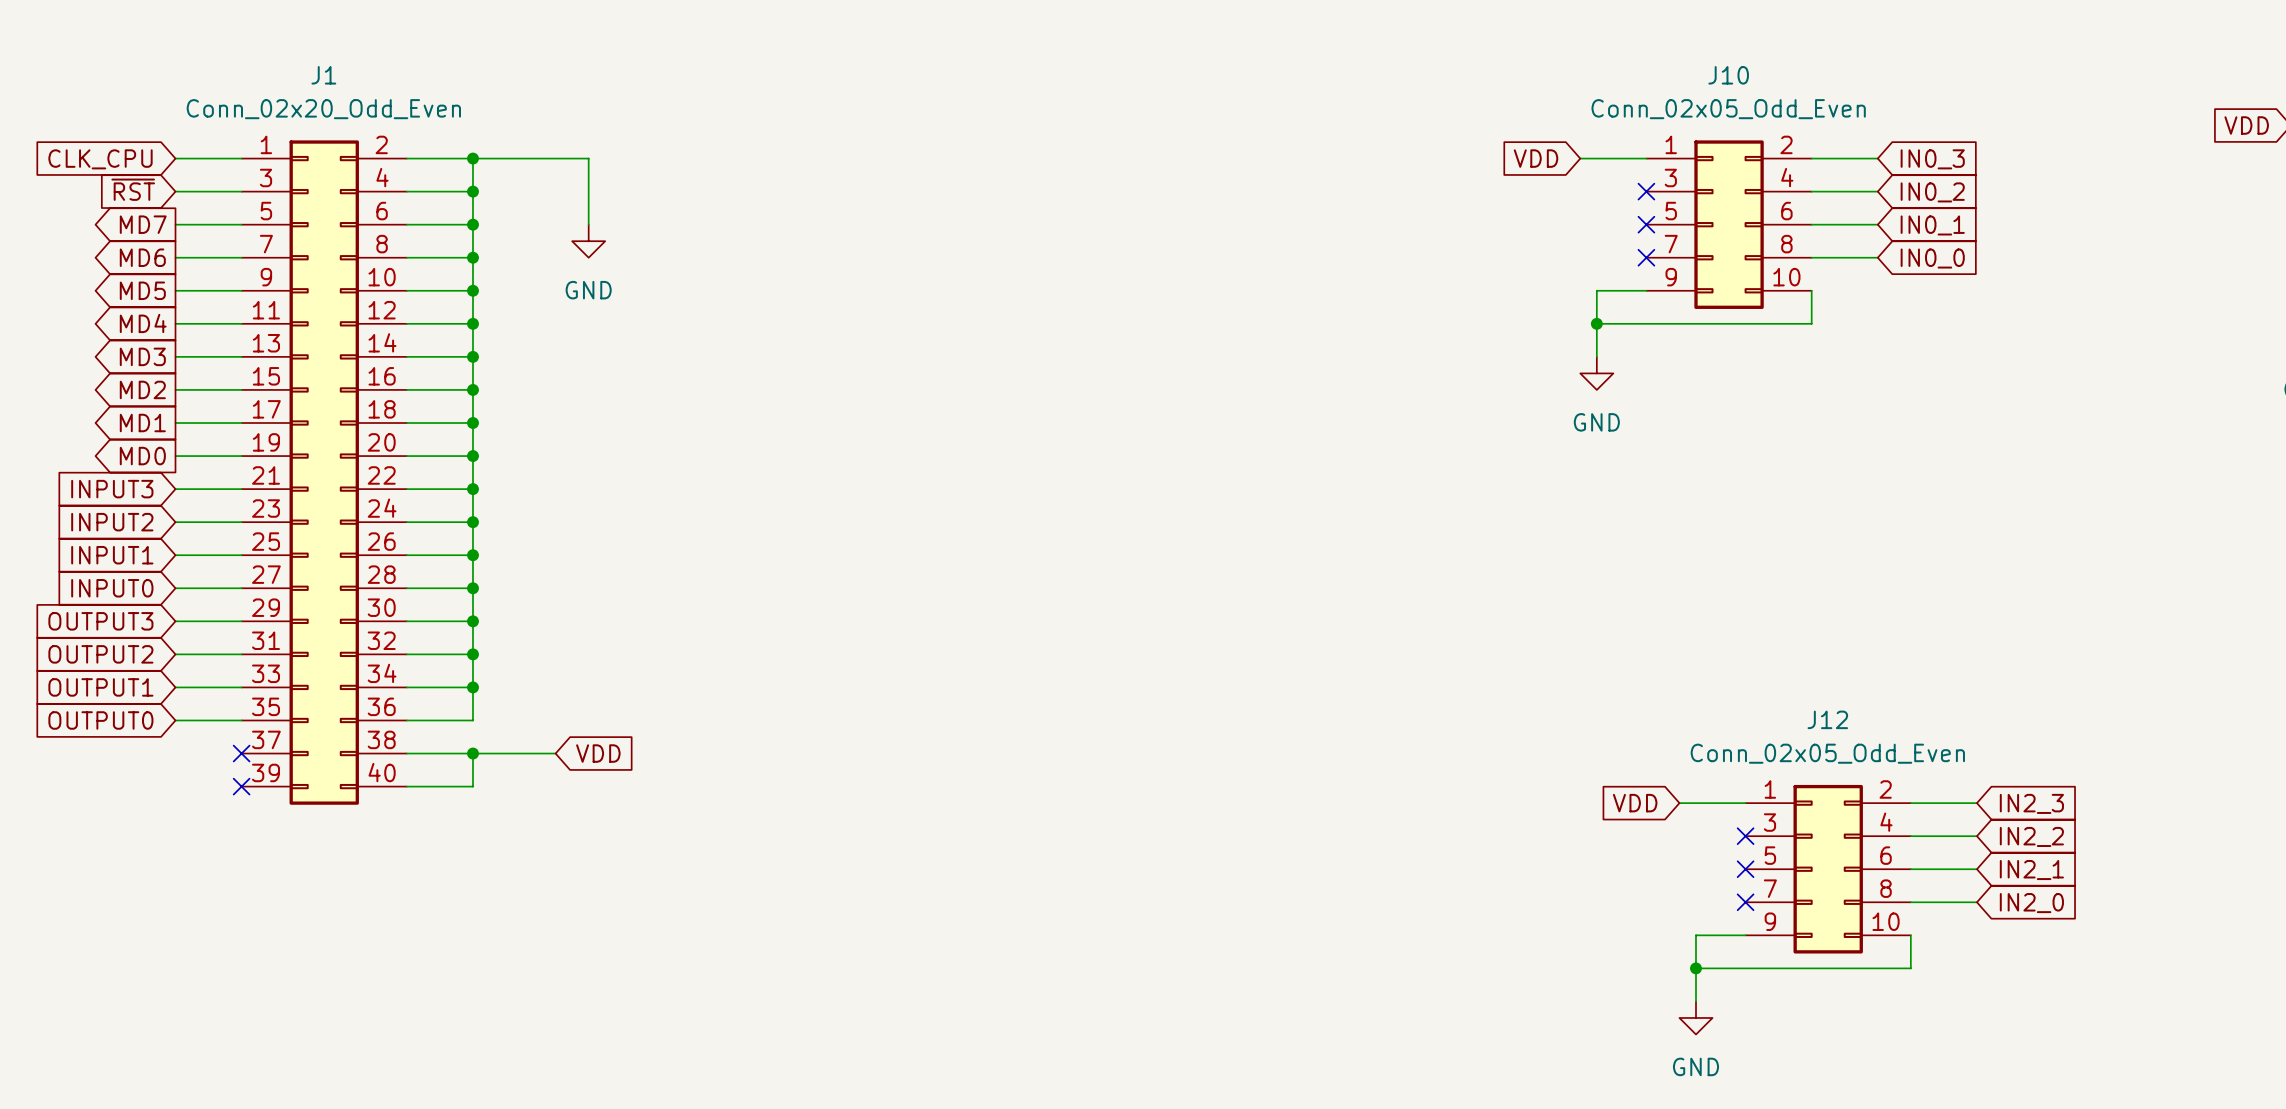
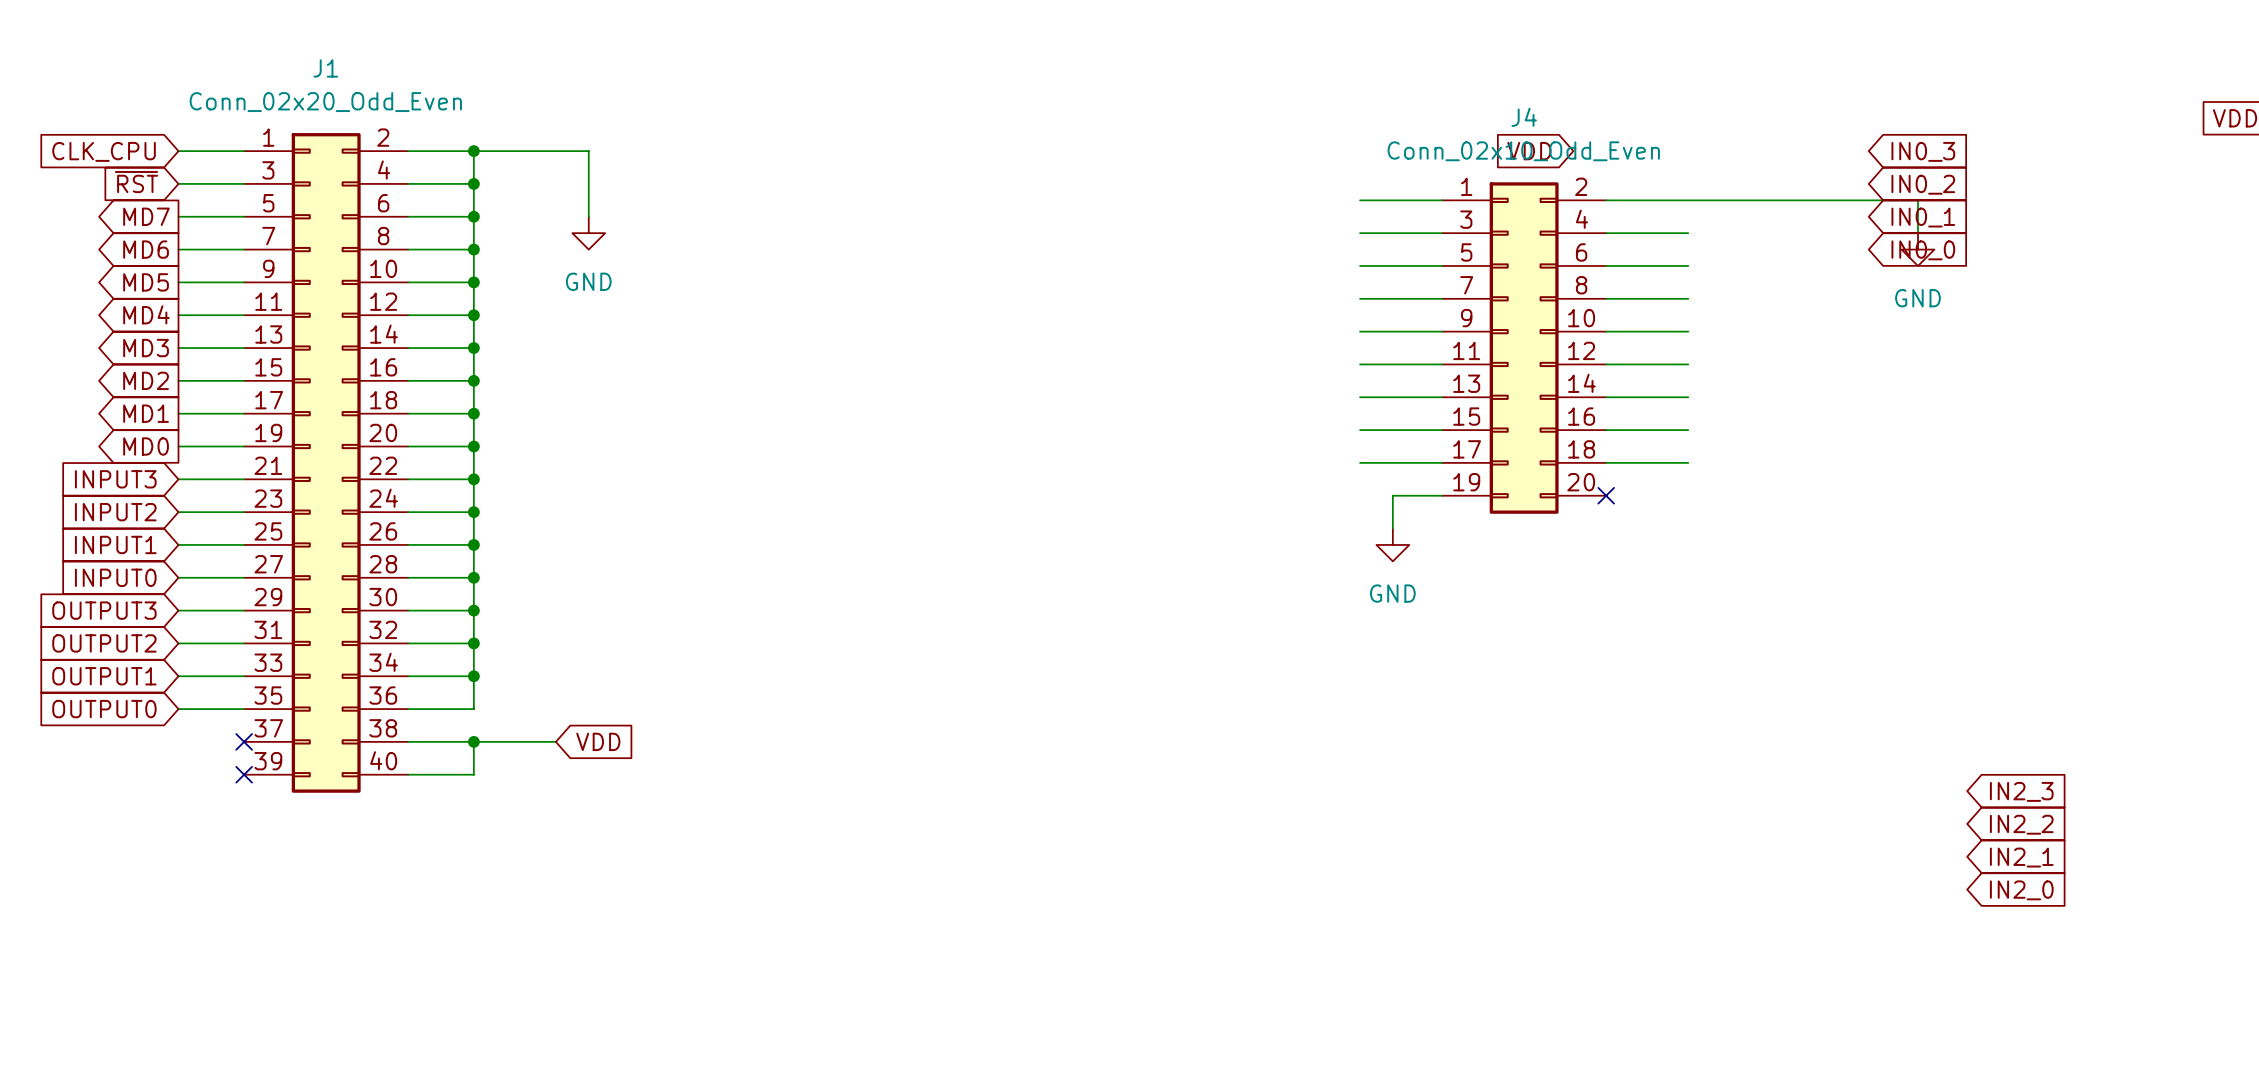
wire: (1580, 158) (1646, 158) -> none
wire: (1811, 158) (1877, 158) -> none
no-connect mark: (1646, 191) -> none
wire: (1811, 191) (1877, 191) -> none
wire: none -> (1360, 200) (1442, 200)
wire: none -> (1606, 200) (1917, 200) (1917, 233)
no-connect mark: (1646, 224) -> none
J10: Conn_02x05_Odd_Even (1729, 224) -> none
wire: (1811, 224) (1877, 224) -> none
wire: none -> (1360, 233) (1442, 233)
wire: none -> (1606, 233) (1688, 233)
no-connect mark: (1646, 257) -> none
wire: (1811, 257) (1877, 257) -> none
power symbol: none -> GND (1917, 249)
wire: none -> (1360, 265) (1442, 265)
wire: none -> (1606, 265) (1688, 265)
wire: (1646, 290) (1596, 290) (1596, 356) -> none
wire: (1811, 290) (1811, 323) (1596, 323) -> none
wire: none -> (1360, 298) (1442, 298)
wire: none -> (1606, 298) (1688, 298)
junction: (1596, 323) -> none
wire: none -> (1360, 331) (1442, 331)
wire: none -> (1606, 331) (1688, 331)
J4: none -> Conn_02x10_Odd_Even (1524, 348)
wire: none -> (1360, 364) (1442, 364)
power symbol: GND (1596, 373) -> none
wire: none -> (1606, 364) (1688, 364)
wire: none -> (1360, 397) (1442, 397)
wire: none -> (1606, 397) (1688, 397)
wire: none -> (1360, 430) (1442, 430)
wire: none -> (1606, 430) (1688, 430)
wire: none -> (1360, 462) (1442, 462)
wire: none -> (1606, 462) (1688, 462)
wire: none -> (1442, 495) (1392, 495) (1392, 528)
no-connect mark: none -> (1606, 495)
power symbol: none -> GND (1392, 544)
global label: VDD (1635, 803) -> none
wire: (1679, 803) (1745, 803) -> none
wire: (1910, 803) (1976, 803) -> none
no-connect mark: (1745, 836) -> none
wire: (1910, 836) (1976, 836) -> none
no-connect mark: (1745, 869) -> none
J12: Conn_02x05_Odd_Even (1828, 869) -> none
wire: (1910, 869) (1976, 869) -> none
no-connect mark: (1745, 902) -> none
wire: (1910, 902) (1976, 902) -> none
wire: (1745, 935) (1695, 935) (1695, 1001) -> none
wire: (1910, 935) (1910, 968) (1695, 968) -> none
junction: (1695, 968) -> none
power symbol: GND (1695, 1017) -> none

